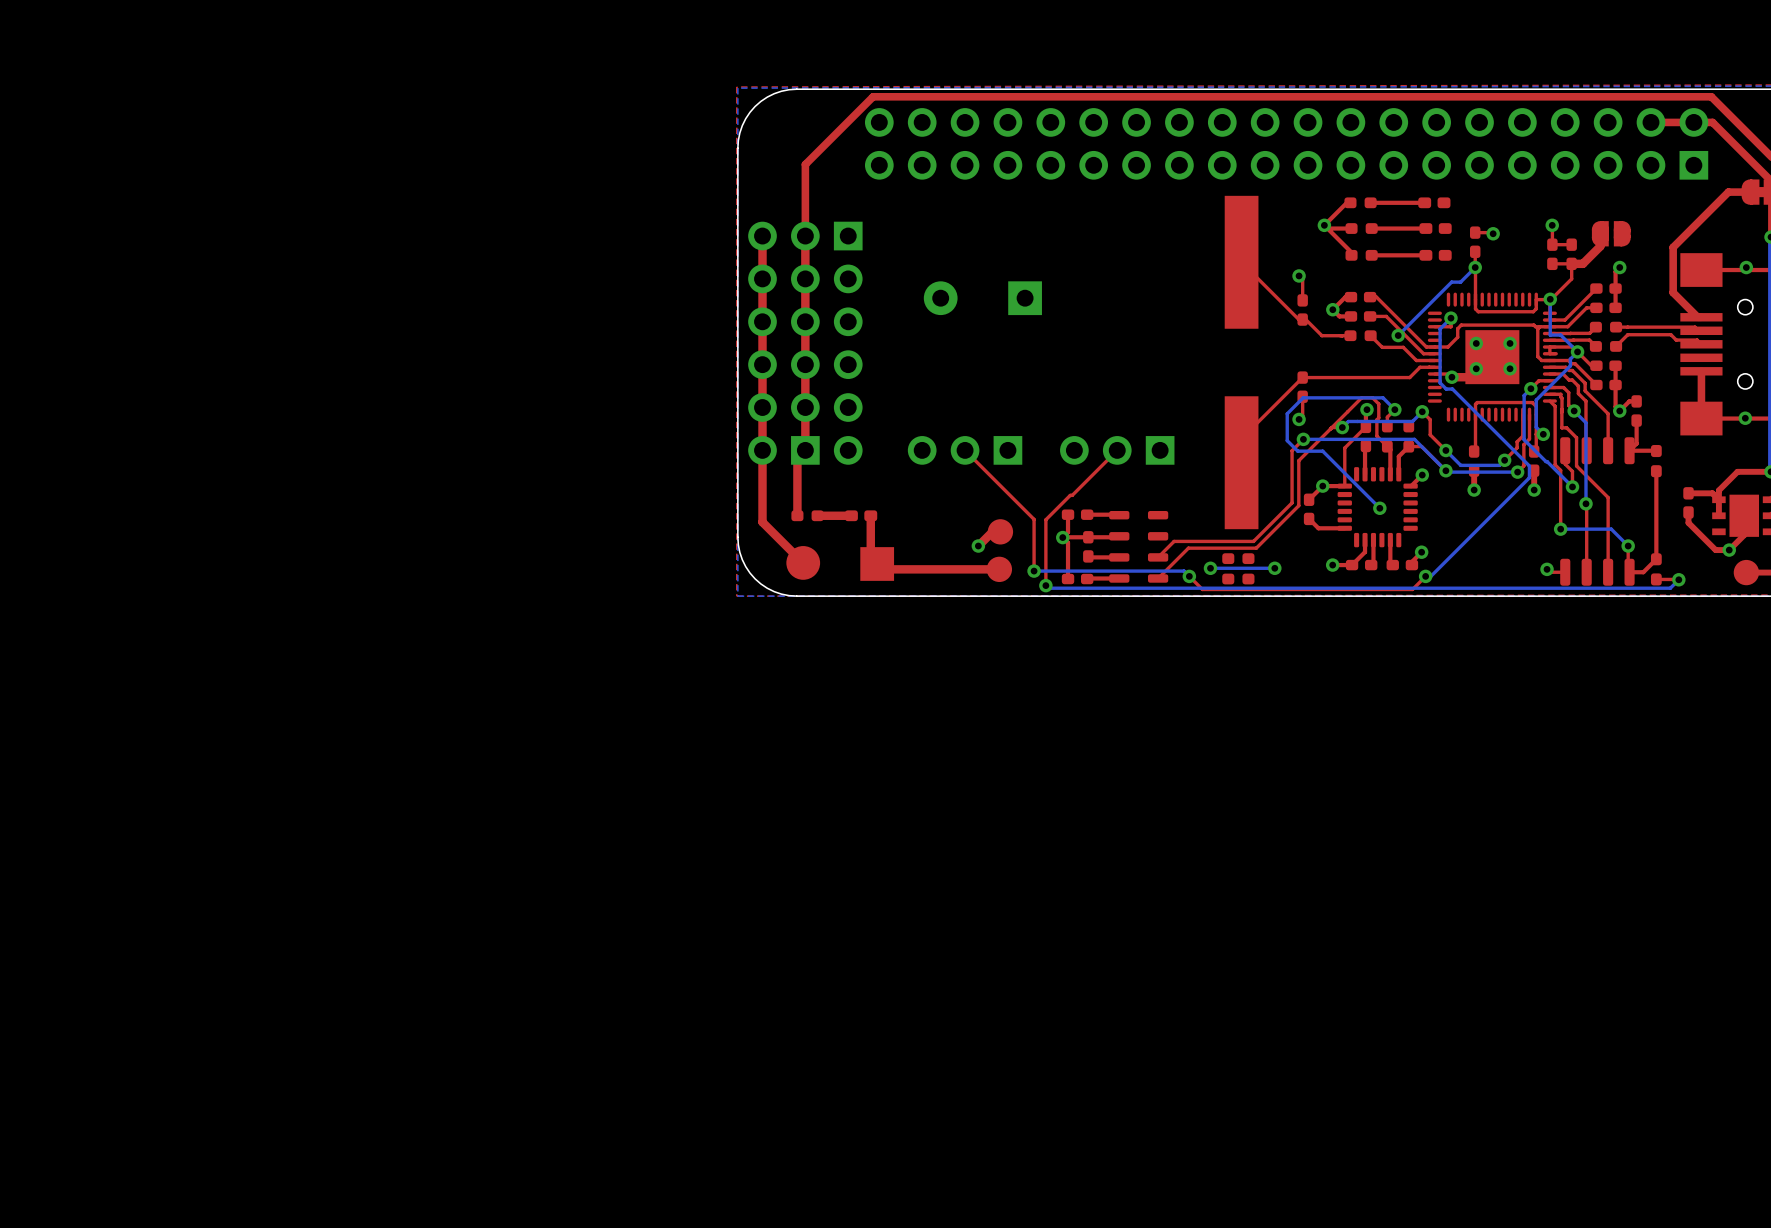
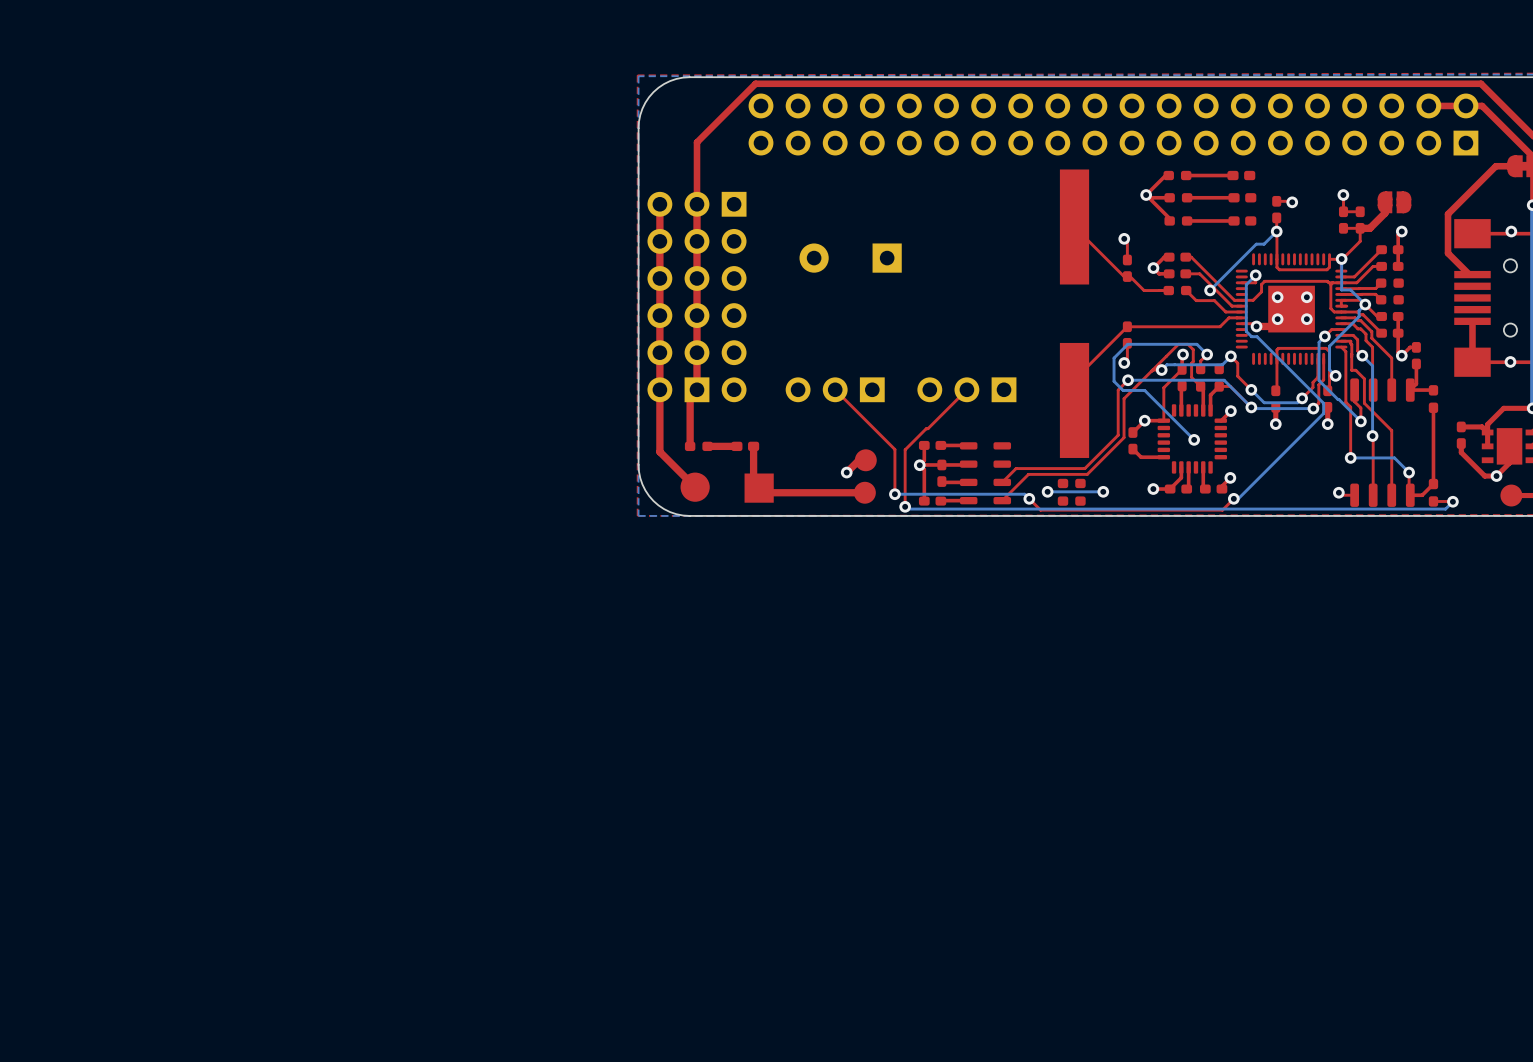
top track: (1616, 327) (1695, 327) (1700, 330) -> none
top track: (1701, 344) (1697, 340) (1676, 340) (1670, 334) (1627, 334) (1616, 346) -> none

